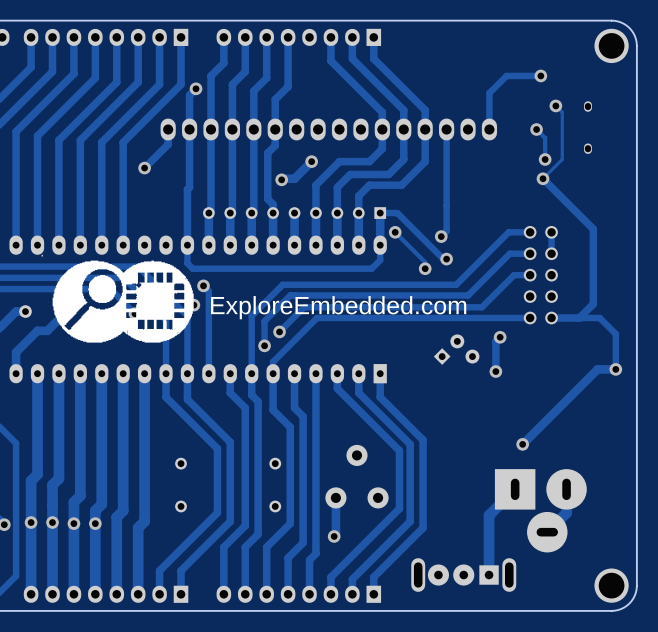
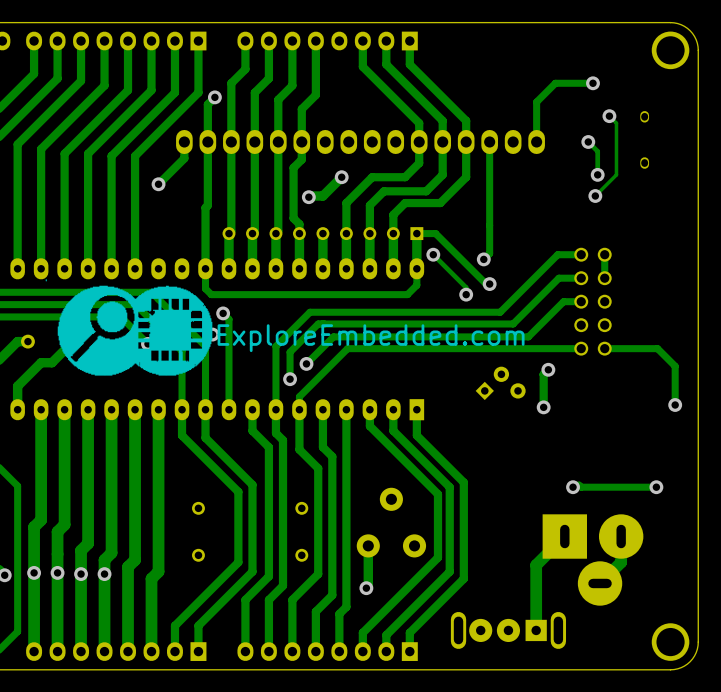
track: (543, 178) (593, 229) (593, 304) (579, 317) (551, 317) -> none
track: (615, 369) (597, 369) (522, 444) -> none
track: none -> (578, 484) (581, 487) (656, 487)
via: none -> (656, 487)

